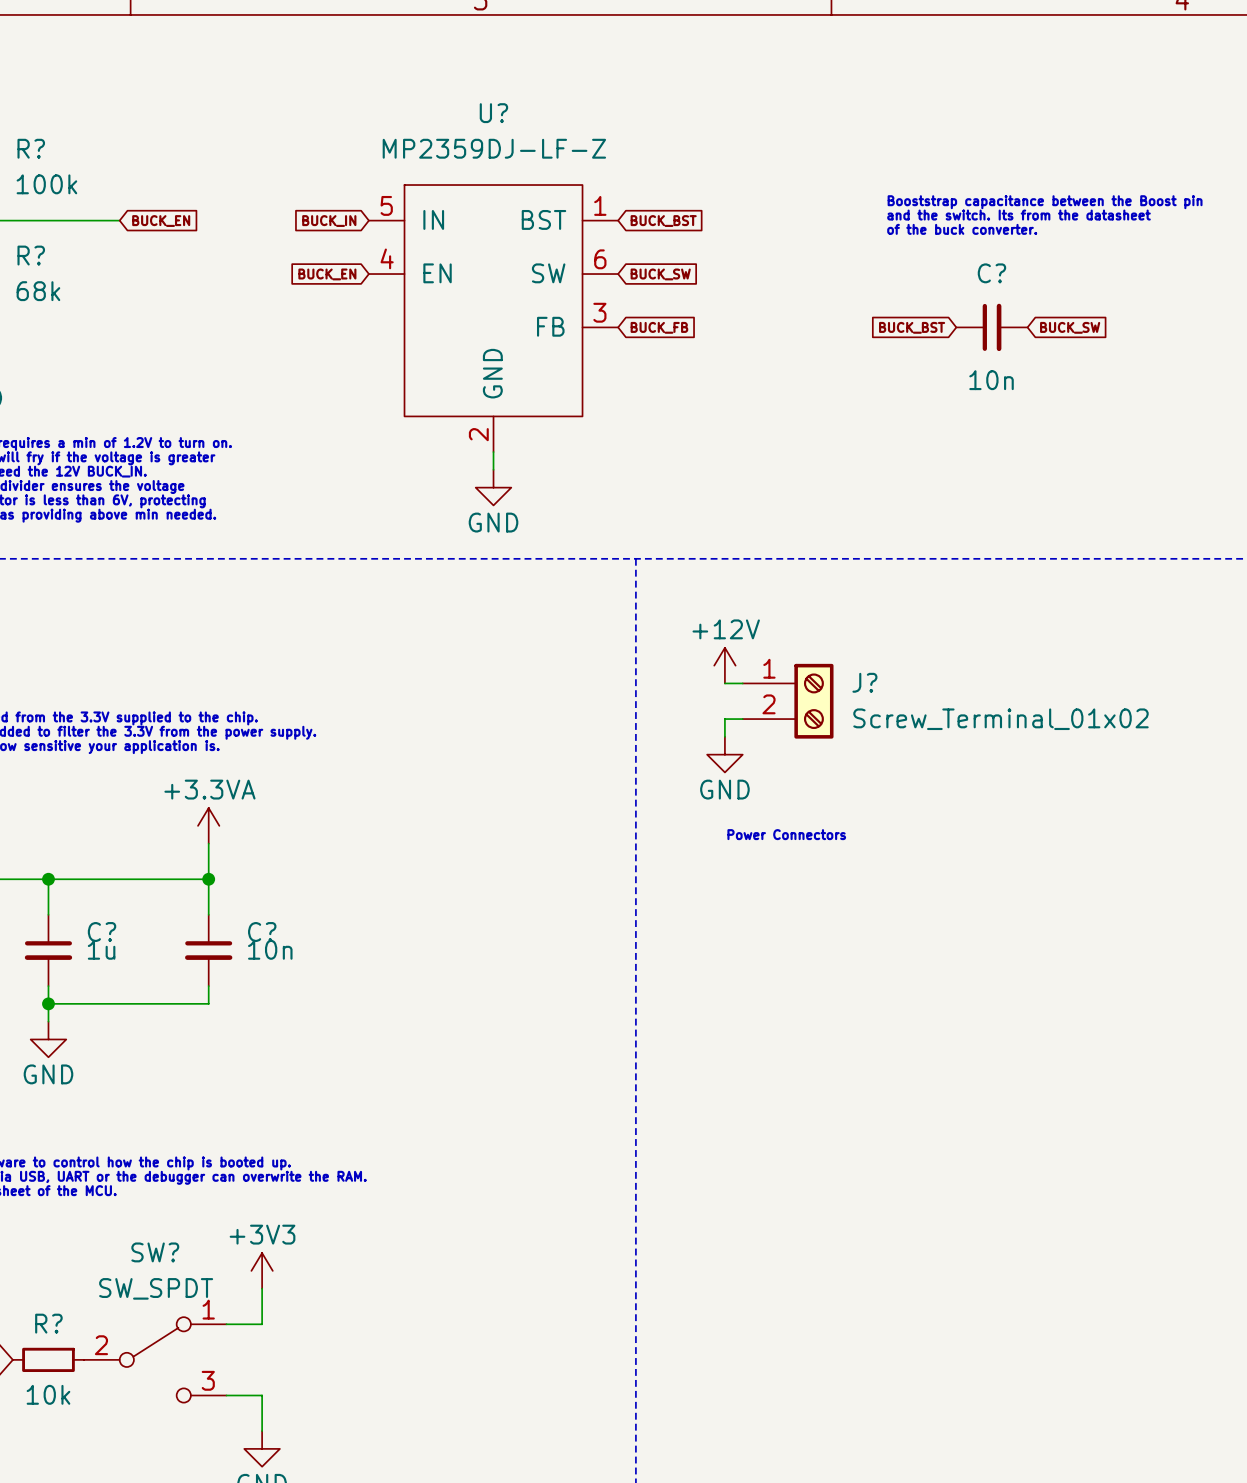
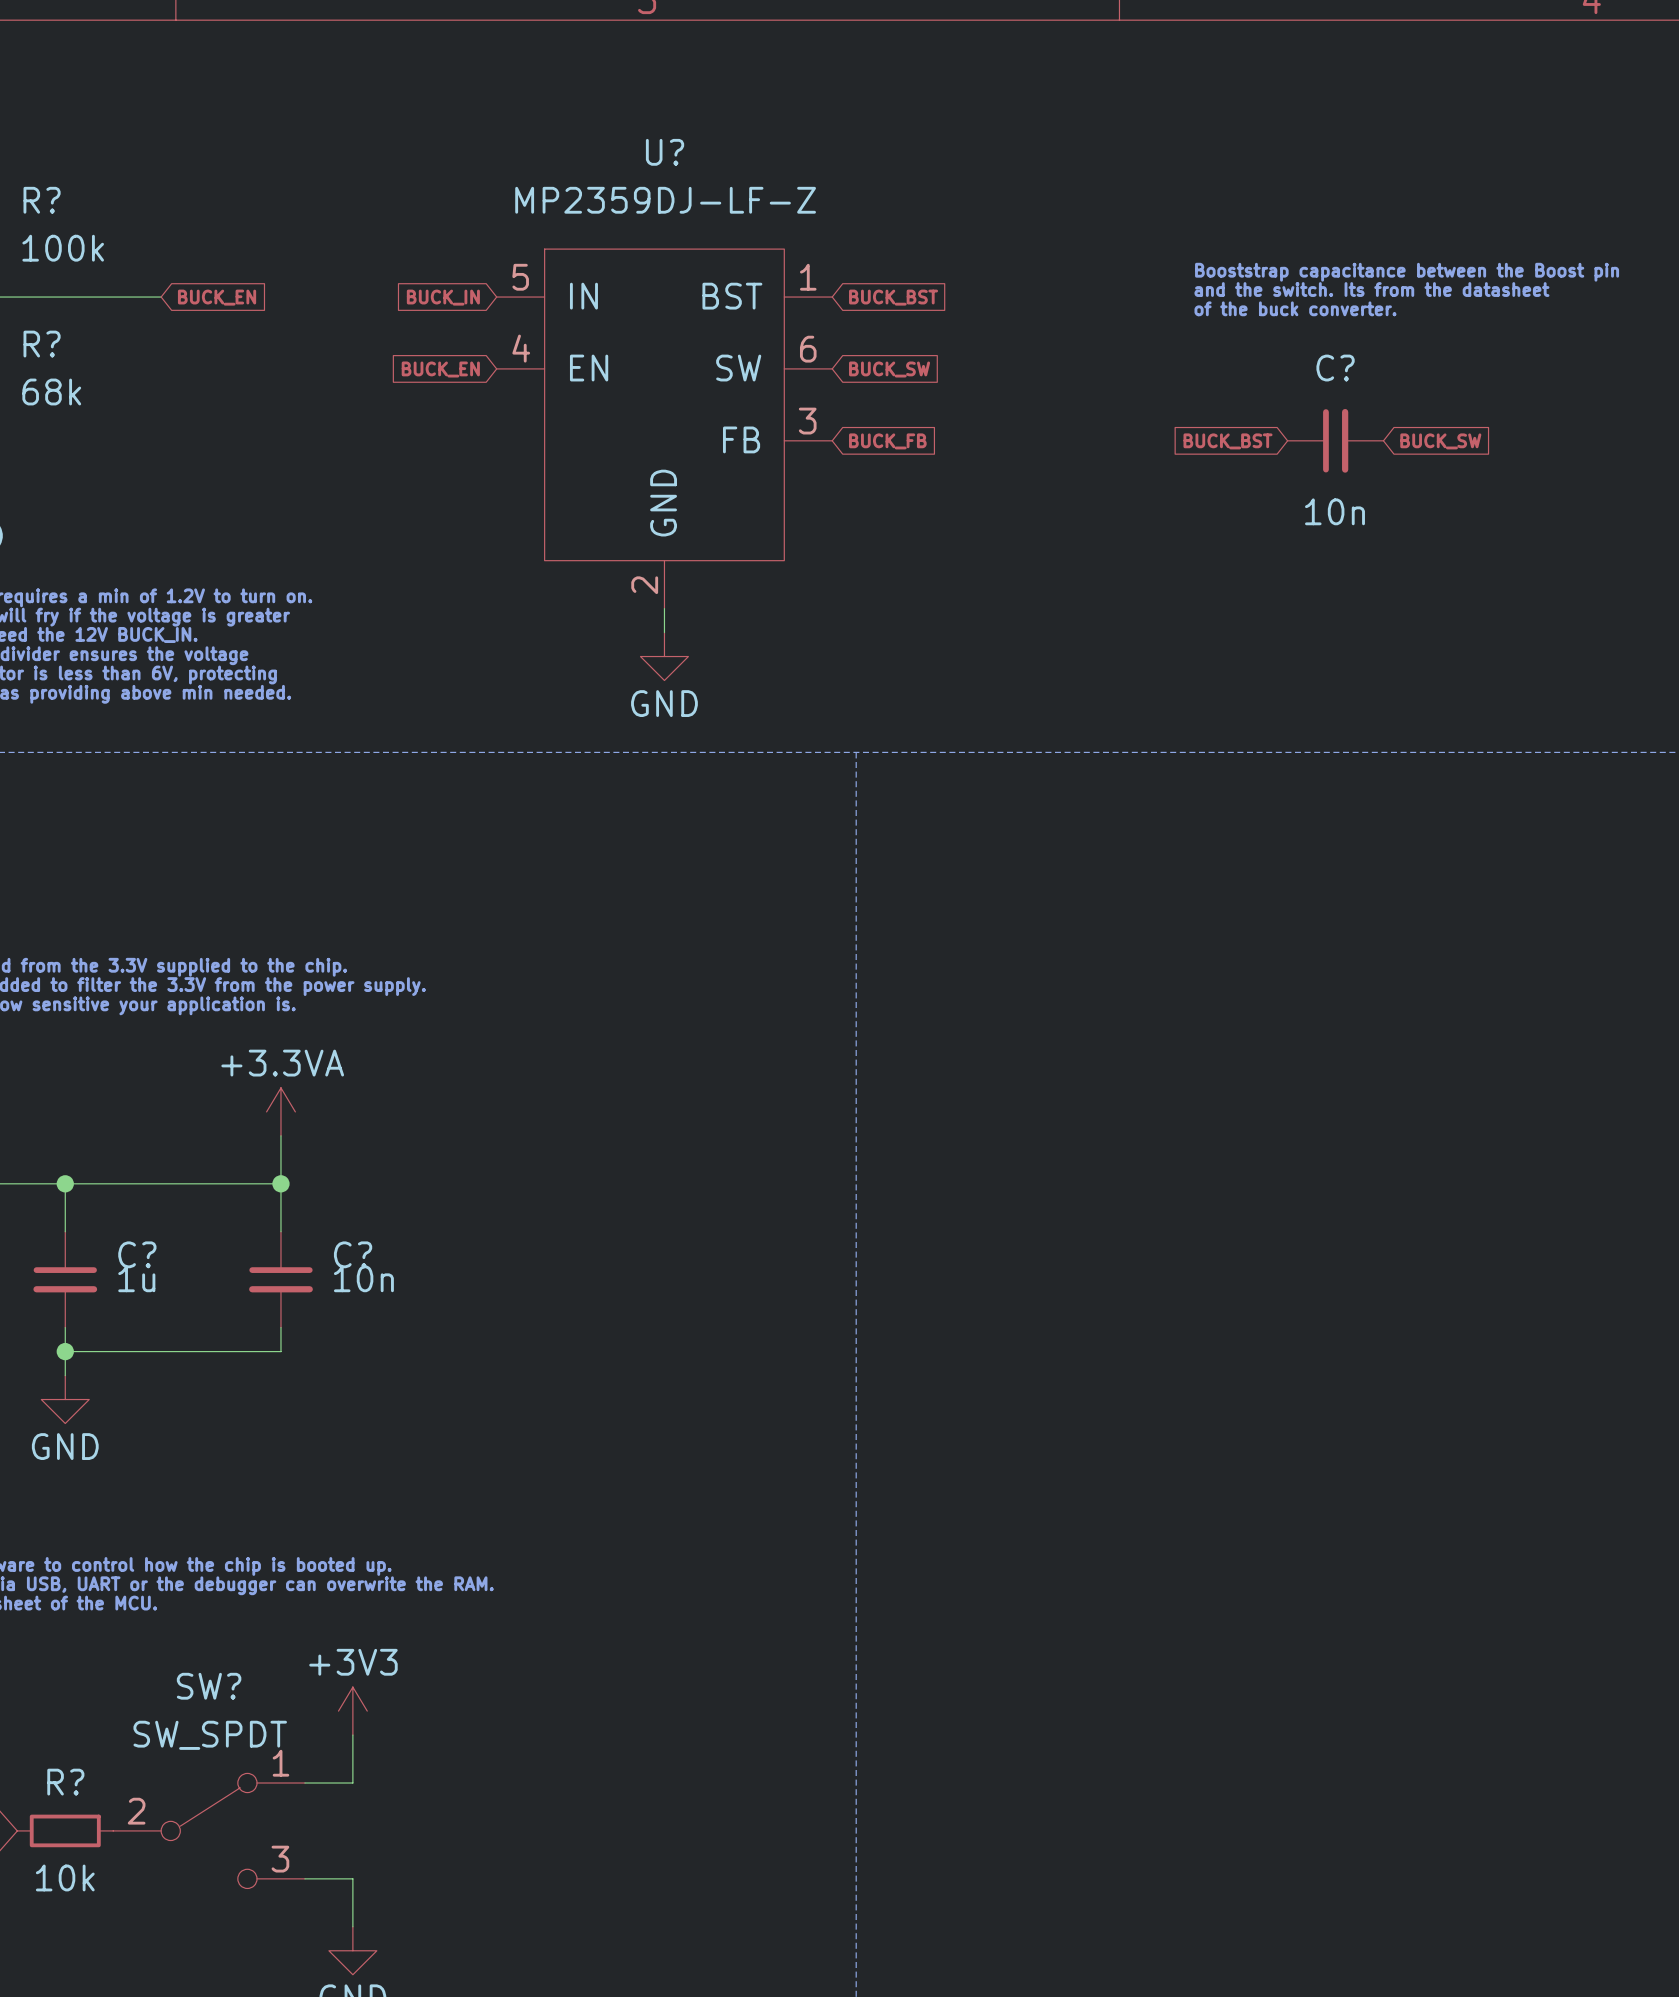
power symbol: +12V (724, 665) -> none
wire: (724, 683) (742, 683) -> none
J?: Screw_Terminal_01x02 (788, 701) -> none
wire: (742, 719) (724, 719) (724, 736) -> none
power symbol: GND (724, 754) -> none
text: Power Connectors (786, 834) -> none

